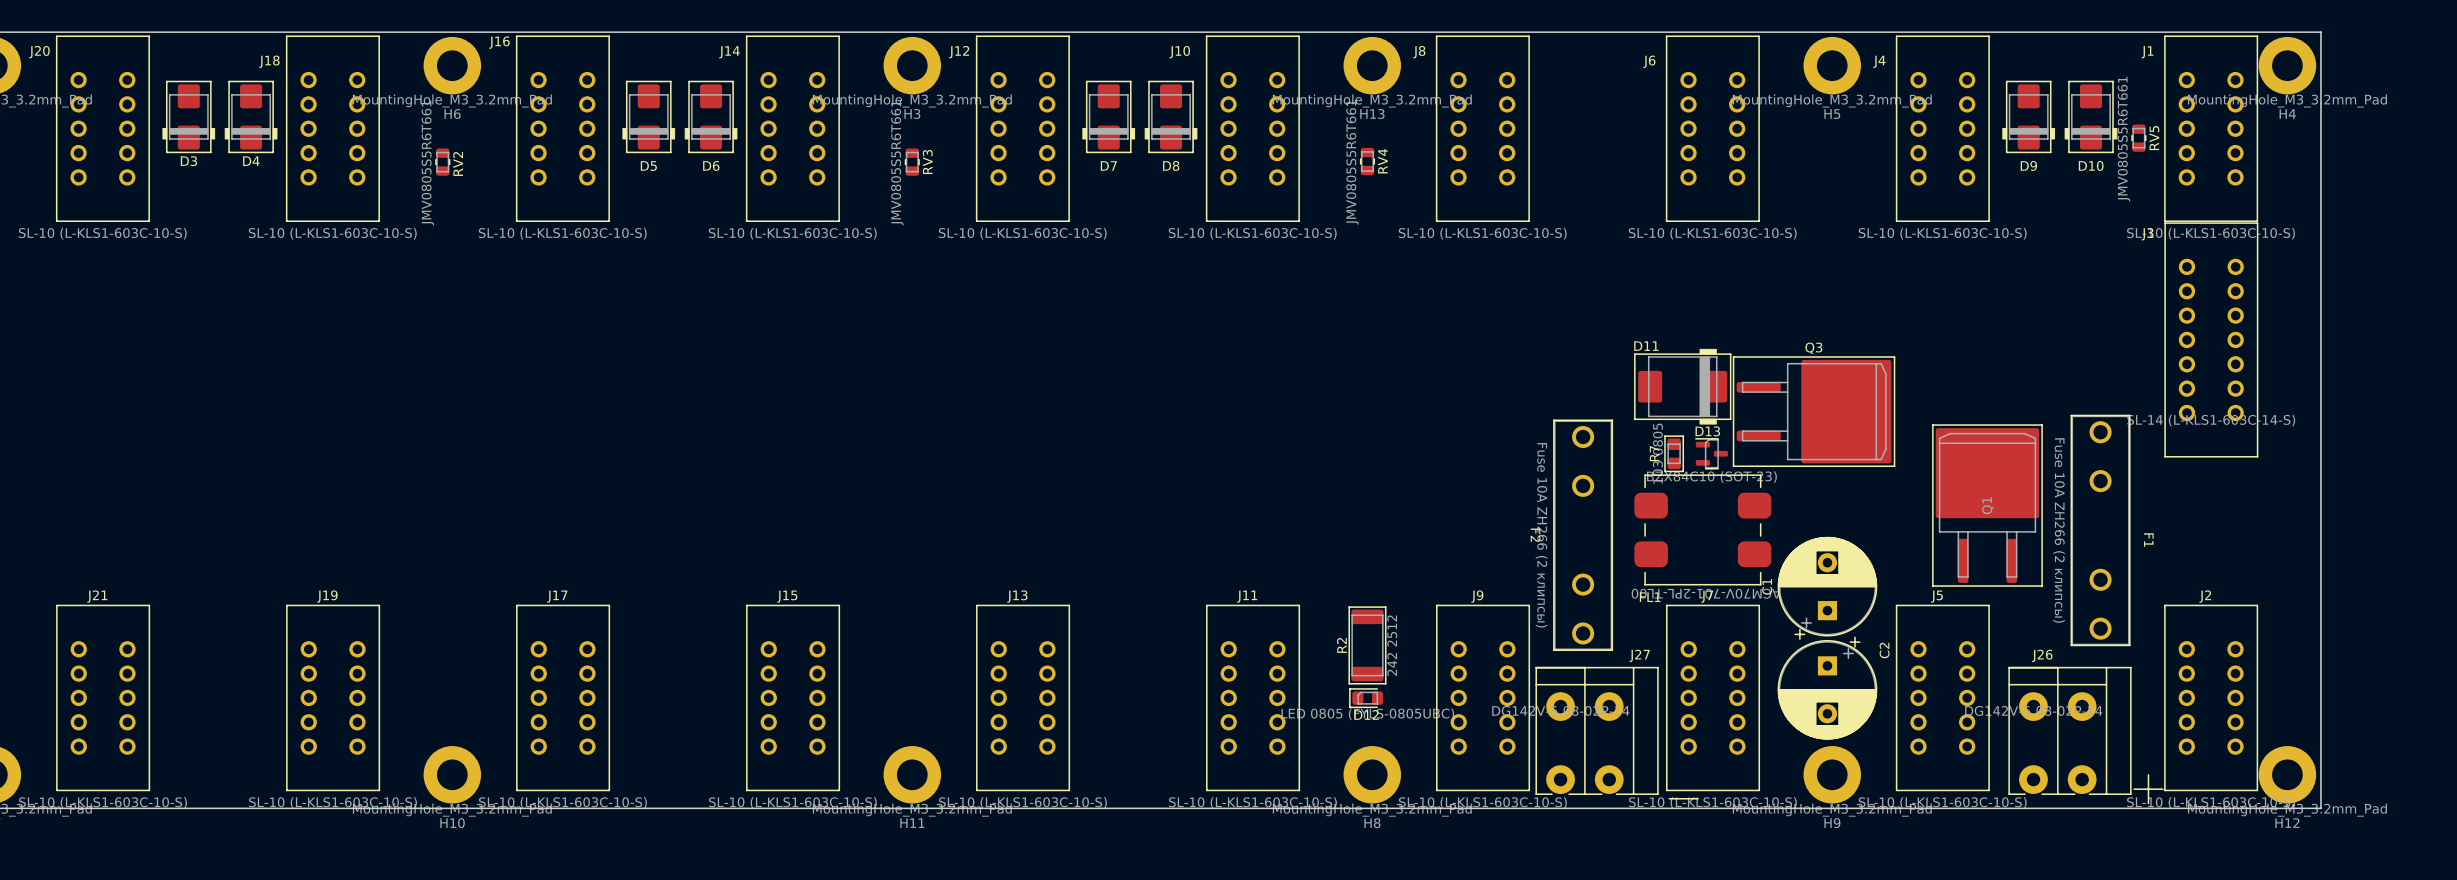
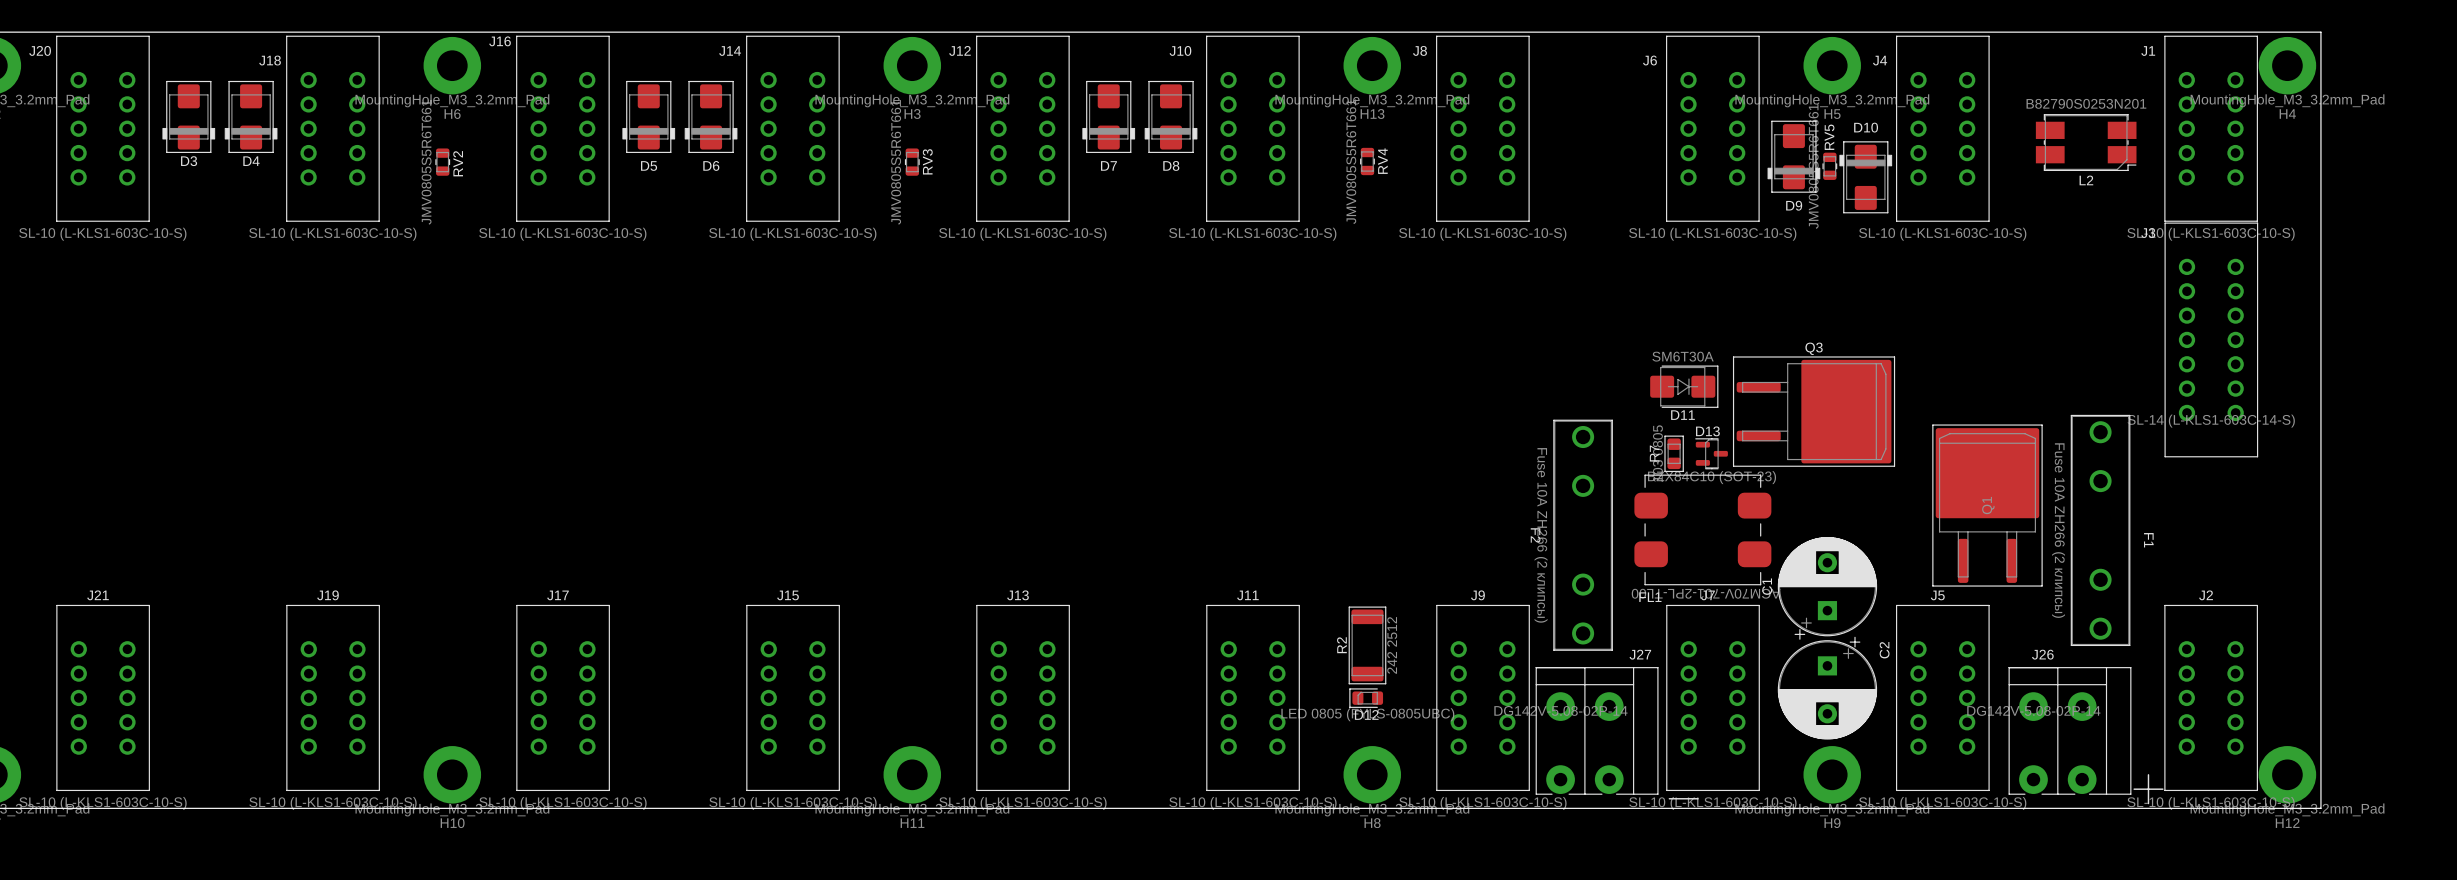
D9 position: (2028, 116) -> (1793, 156)
D10 rotation: 0° (2090, 116) -> 180° (1865, 177)
D10 position: (2090, 116) -> (1865, 177)
RV5 position: (2138, 138) -> (1829, 166)
RV5 name position: RV5 (2154, 138) -> RV5 (1829, 137)
L2: none -> B82790S0253N201 (2086, 142)
D11 name position: D11 (1646, 346) -> D11 (1682, 415)
D11 footprint: [1634, 348, 1732, 425] -> [1650, 365, 1719, 408]
D11 value: none -> SM6T30A (1683, 356)

